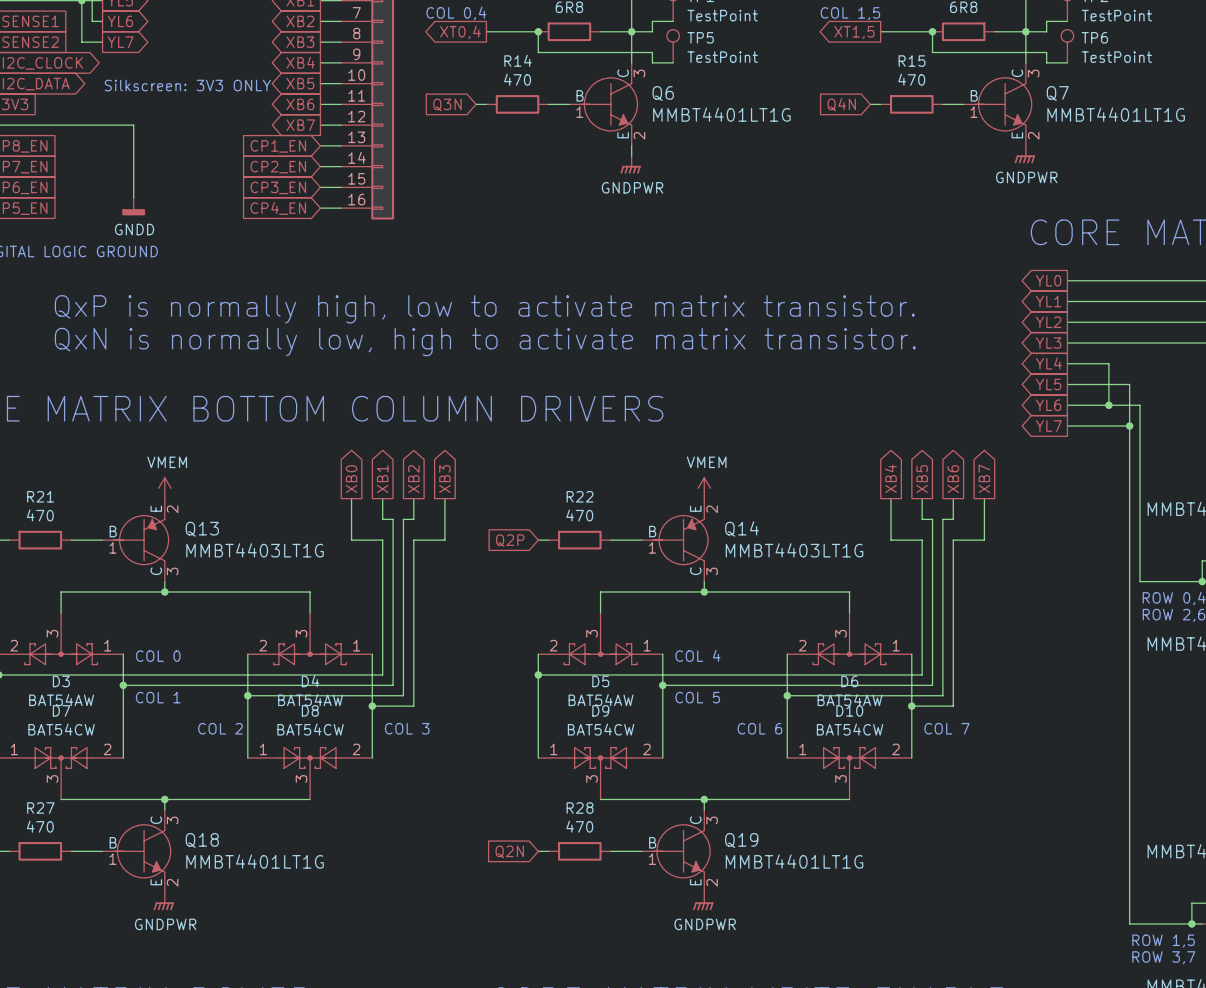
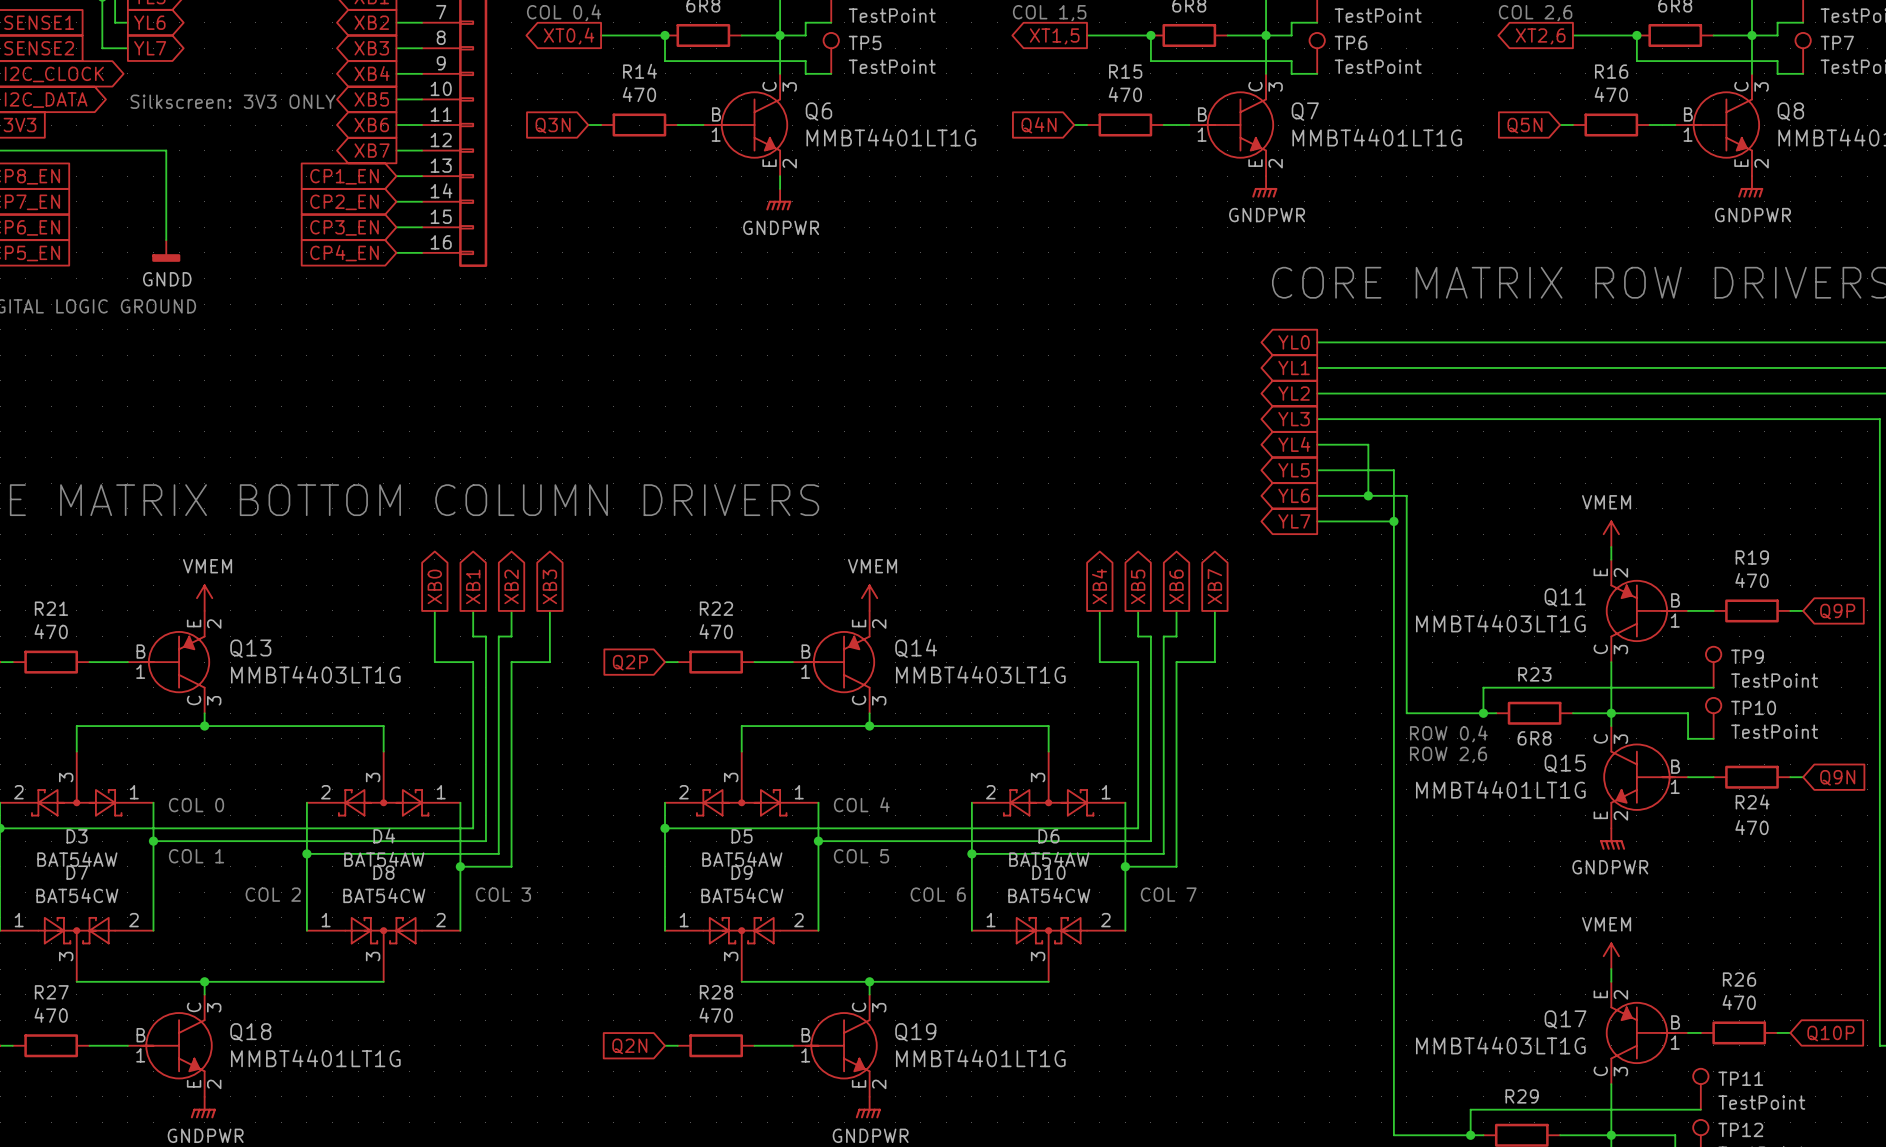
text: QxP is normally high, low to activate matrix transistor. (484, 309) -> none
text: QxN is normally low, high to activate matrix transistor. (485, 342) -> none

